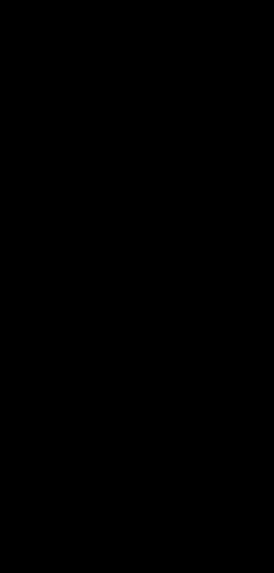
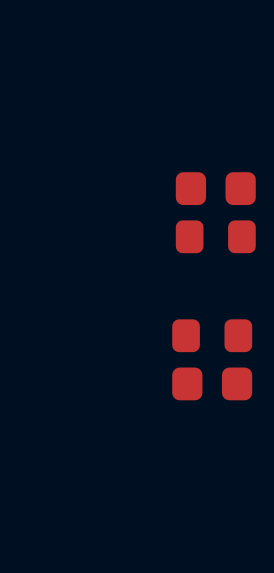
part: none -> (215, 188)
part: none -> (215, 236)
part: none -> (212, 335)
part: none -> (212, 383)

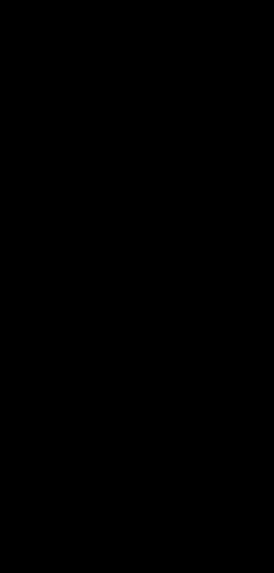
part: (215, 188) -> none
part: (215, 236) -> none
part: (212, 335) -> none
part: (212, 383) -> none

